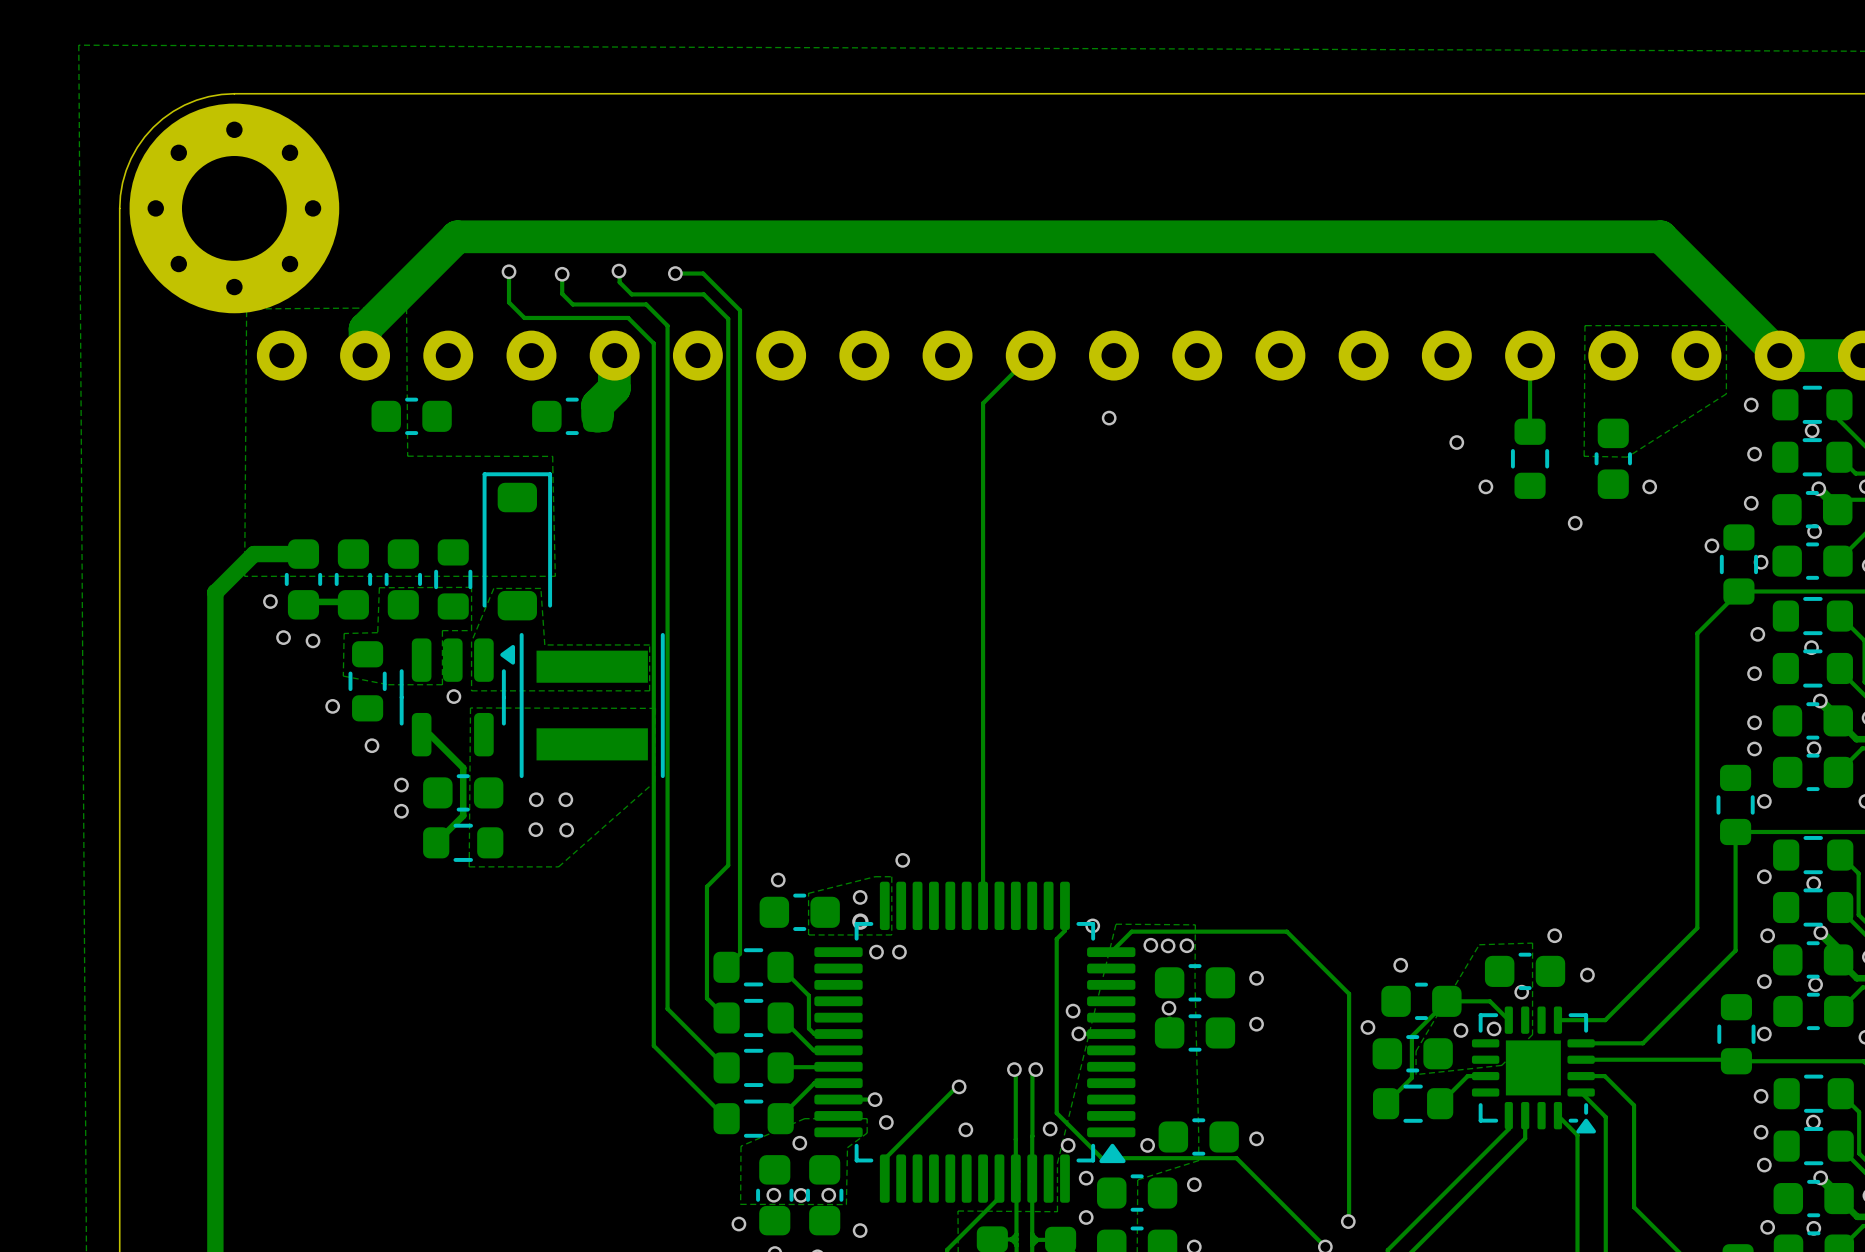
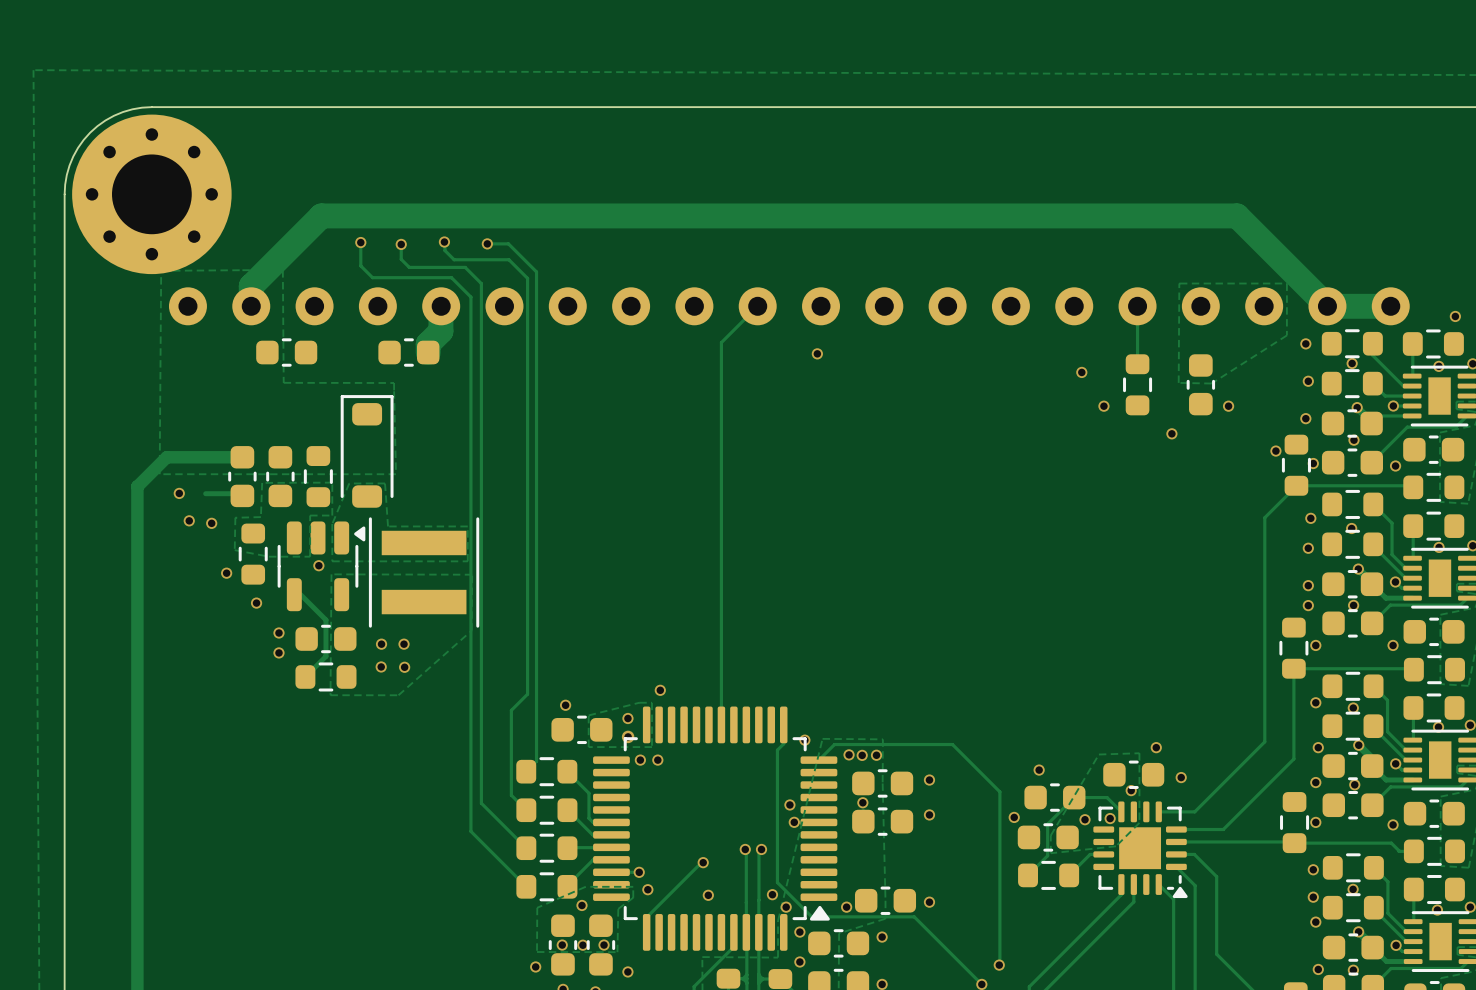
track: (303, 554) (253, 554) -> (242, 457) (166, 457)
part: (303, 579) -> none

